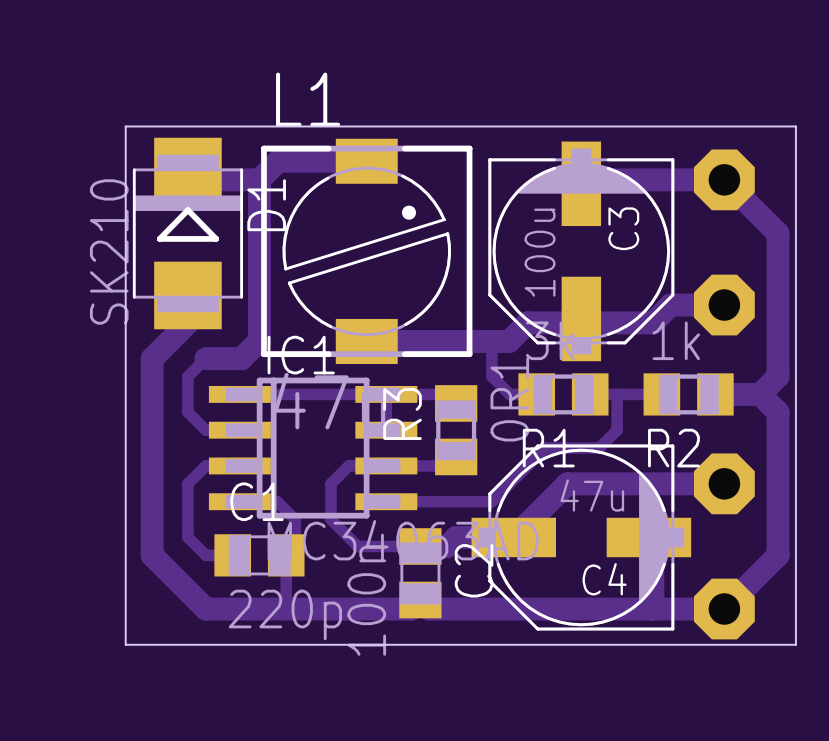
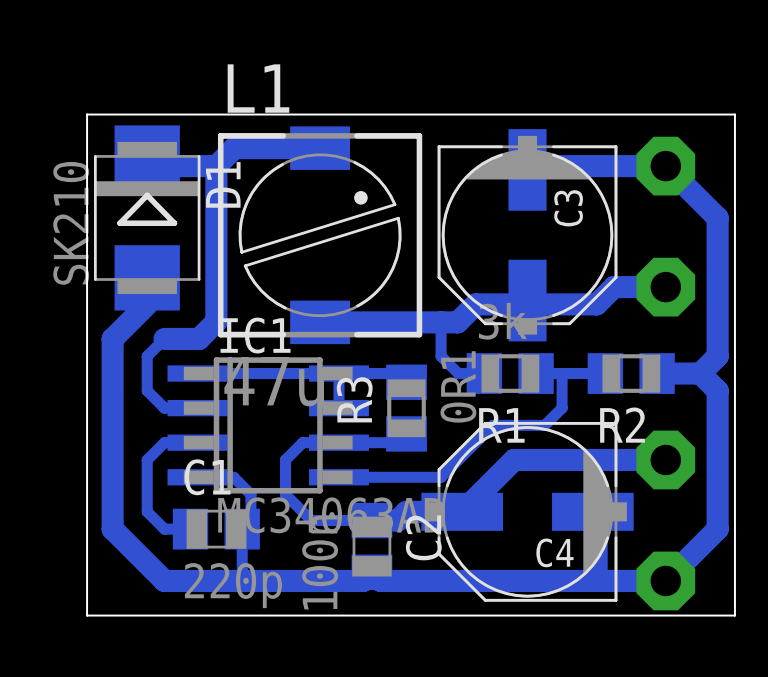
C3 value: 100u (540, 252) -> none
R2 value: 1k (676, 340) -> none
C4 value: 47u (592, 495) -> none

